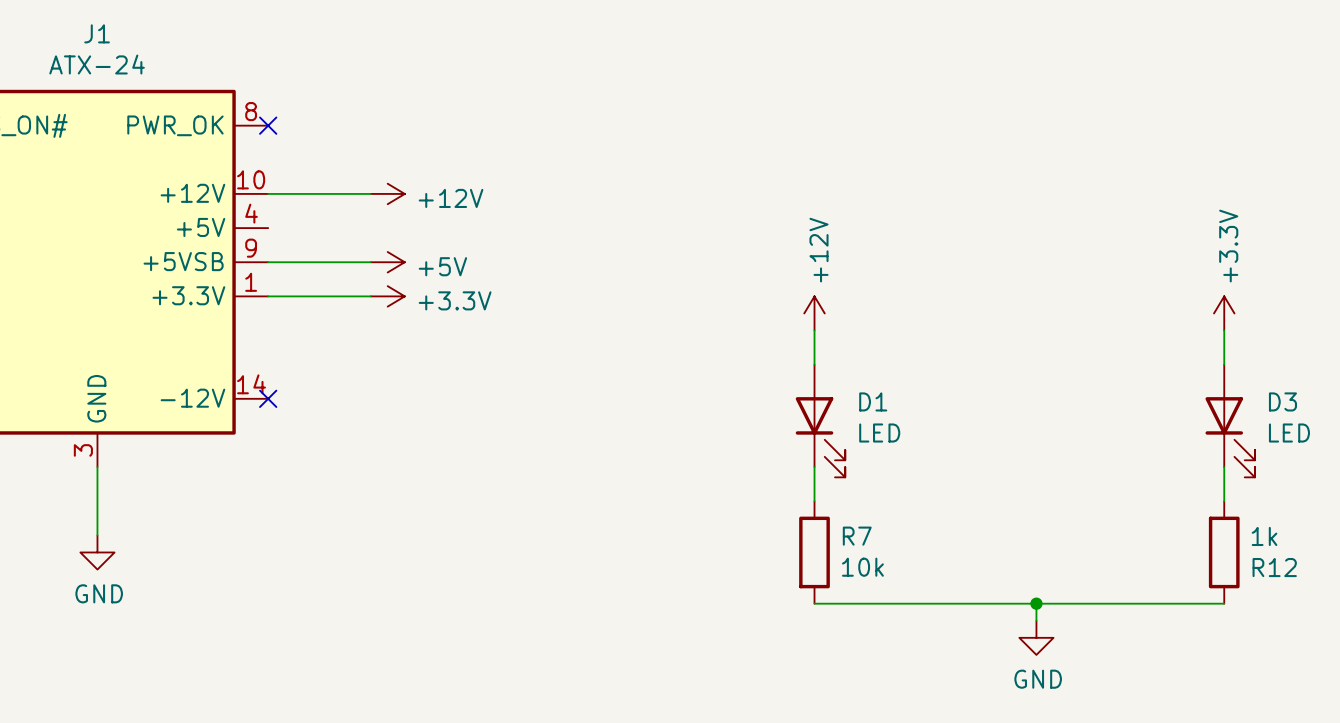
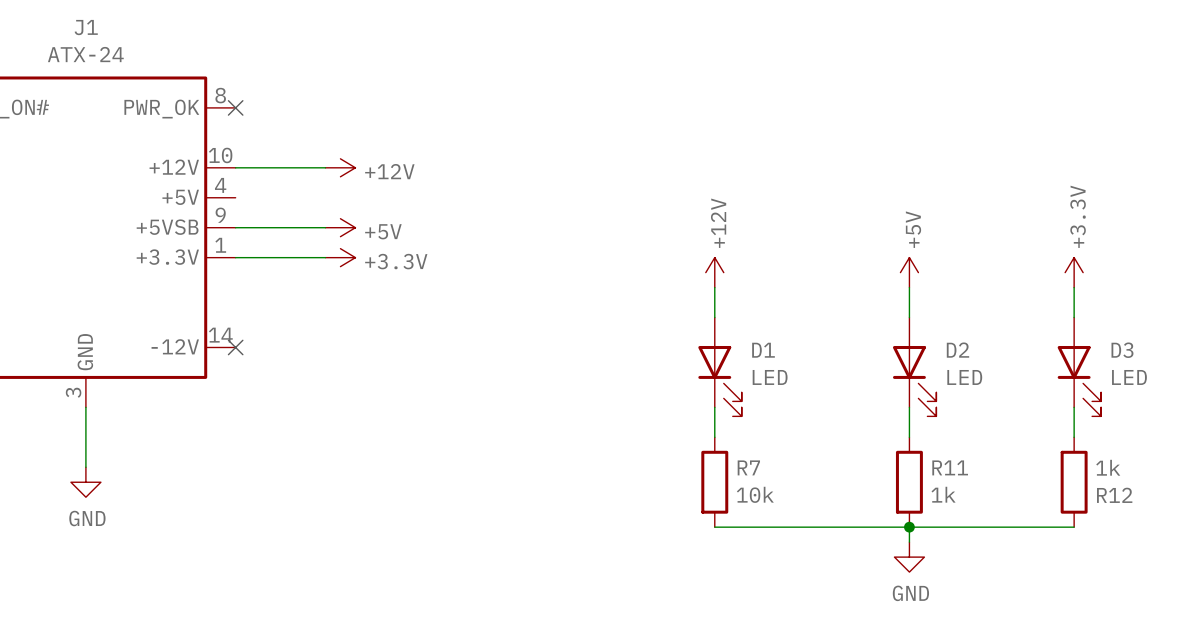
power symbol: none -> +5V (909, 272)
wire: none -> (909, 287) (909, 317)
D2: none -> LED (914, 366)
wire: none -> (909, 407) (909, 437)
R11: none -> 1k (909, 482)

